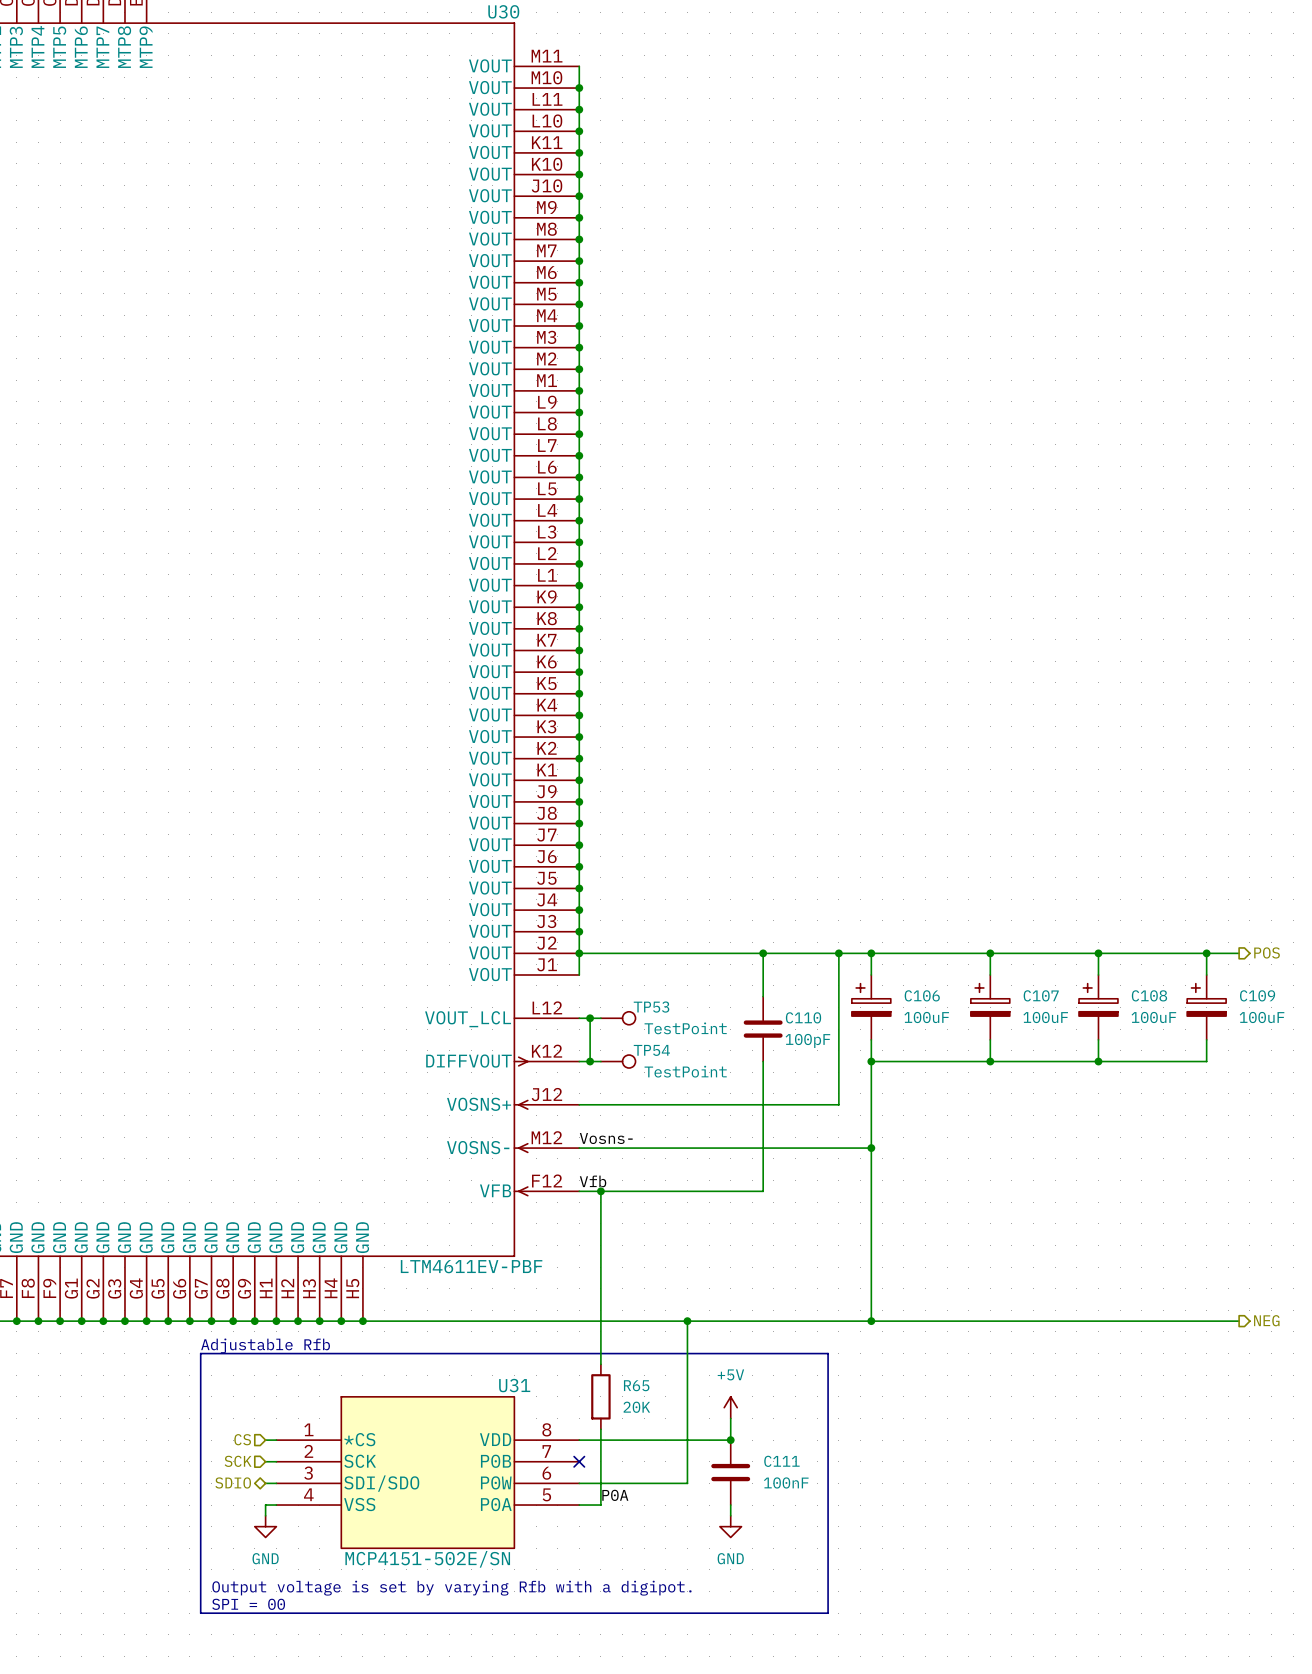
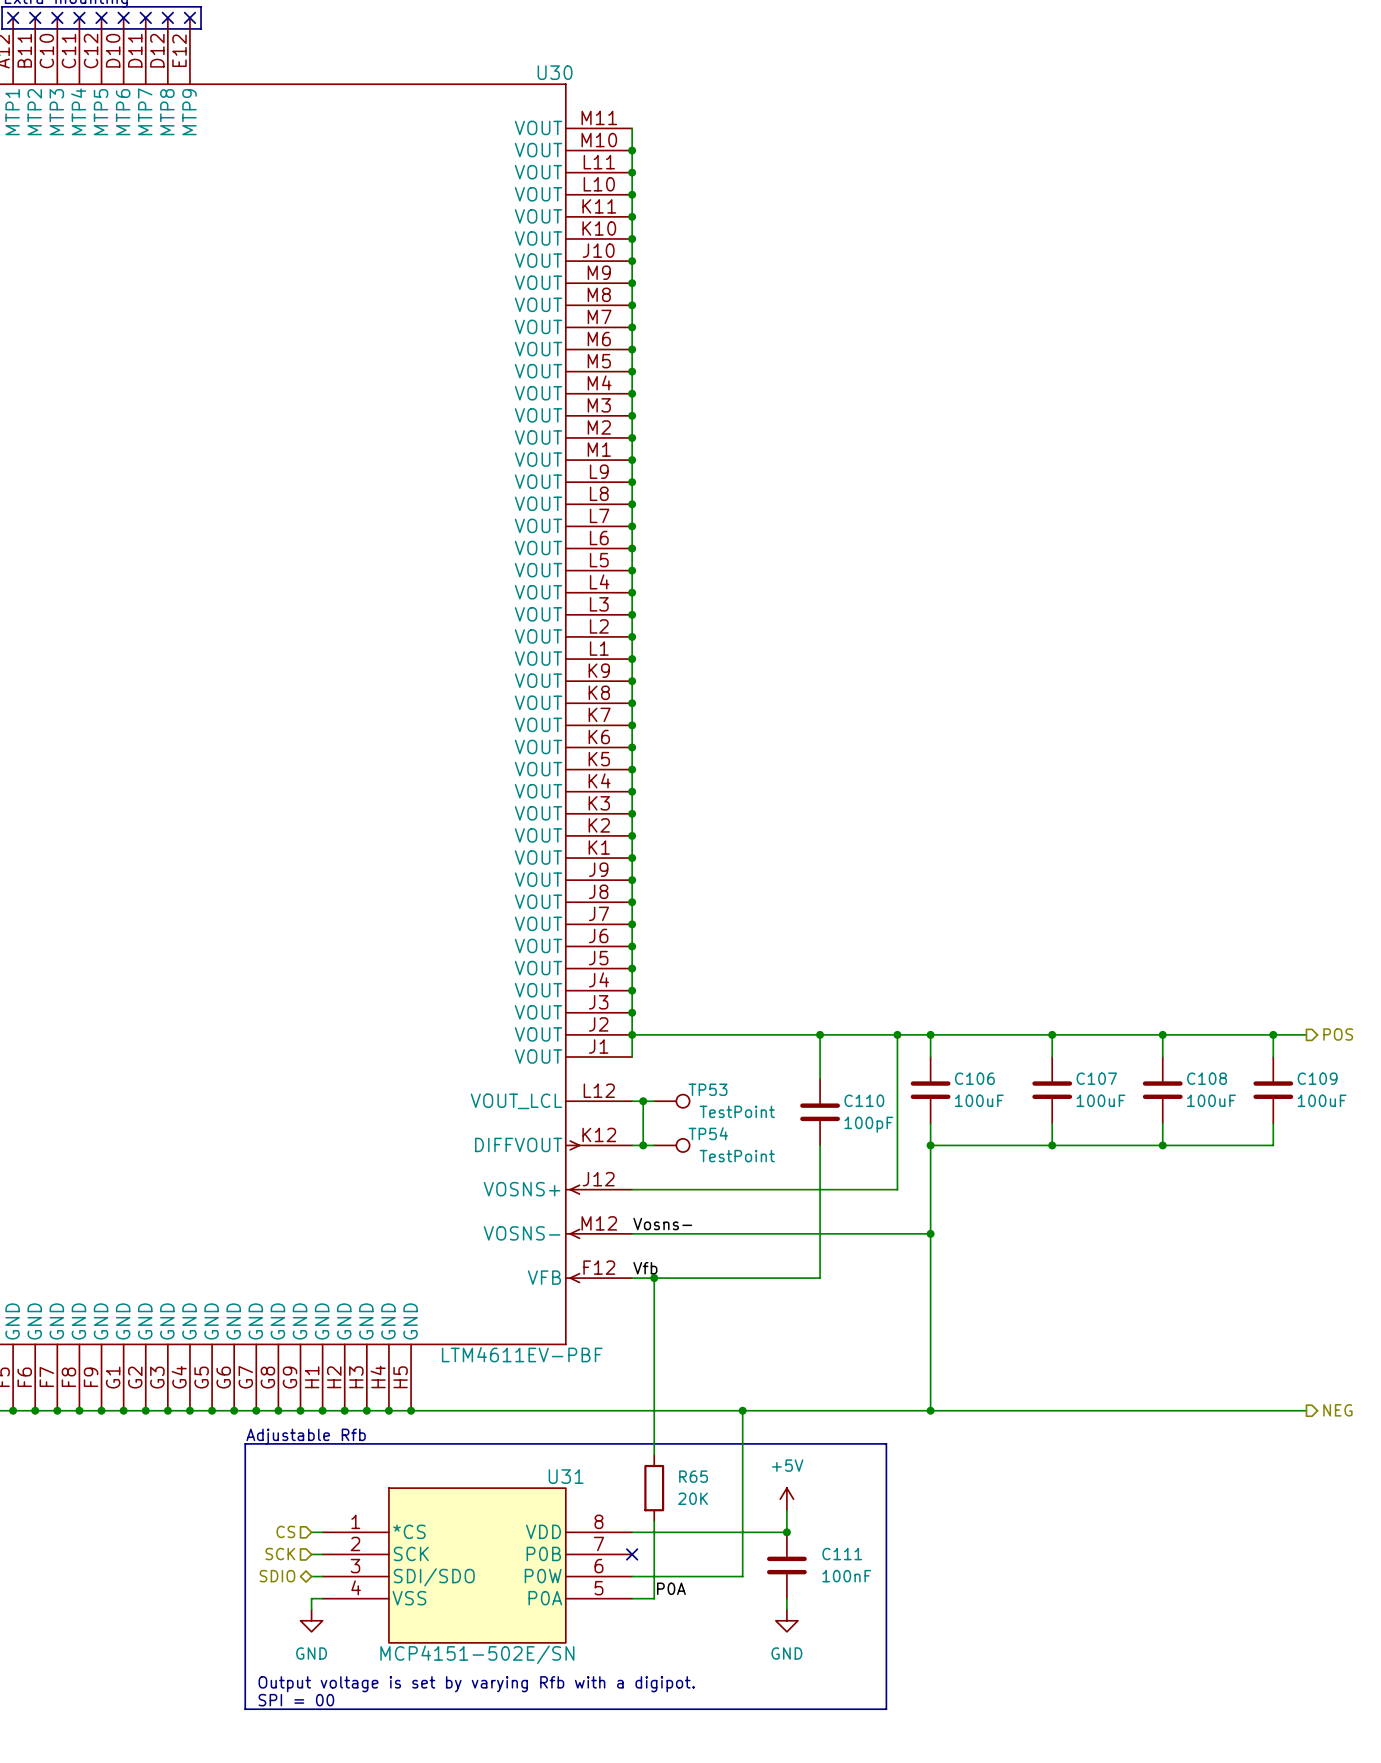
C106 symbol: [851, 975, 891, 1040] -> [910, 1057, 951, 1124]
C107 symbol: [970, 975, 1010, 1040] -> [1032, 1057, 1073, 1124]
C108 symbol: [1079, 975, 1118, 1040] -> [1142, 1057, 1183, 1124]
C109 symbol: [1187, 975, 1227, 1040] -> [1253, 1057, 1294, 1124]

